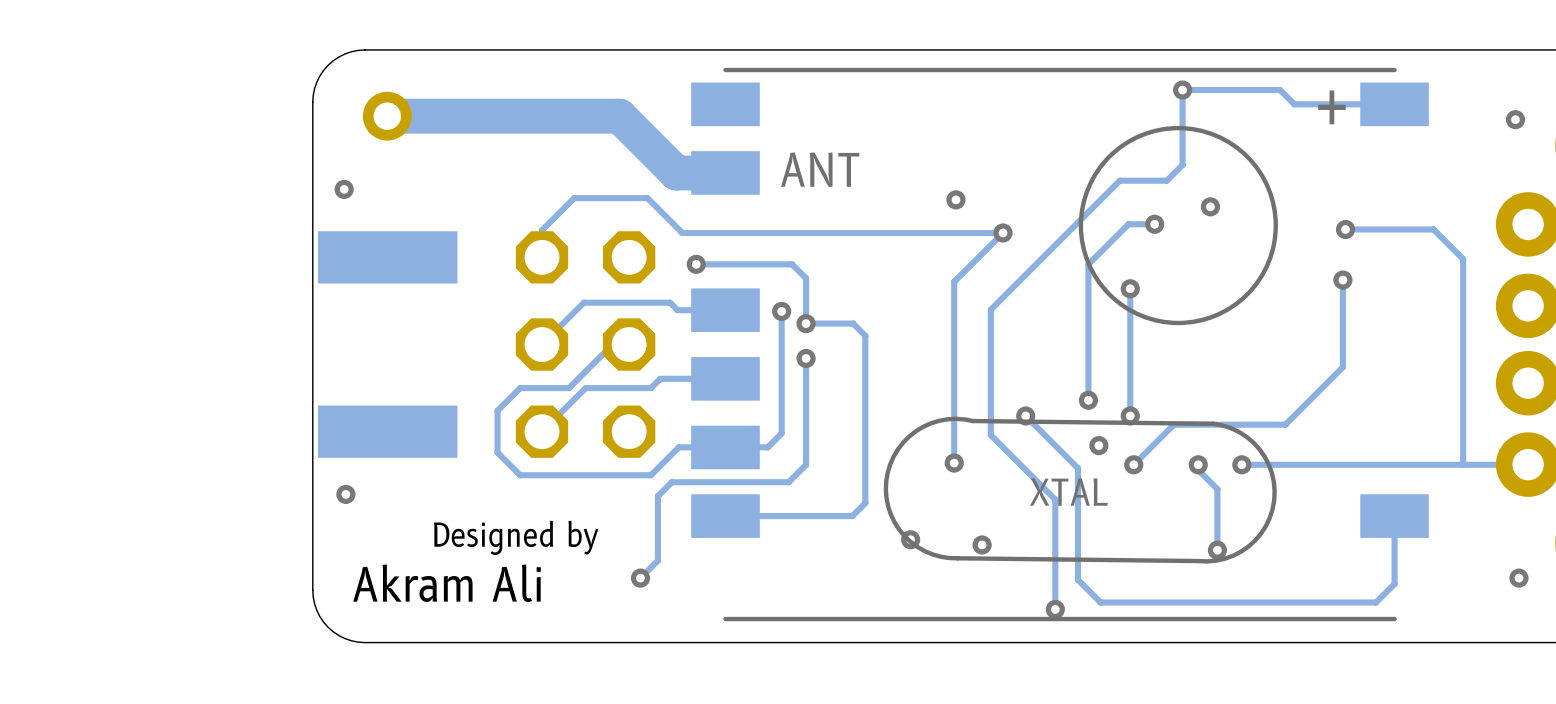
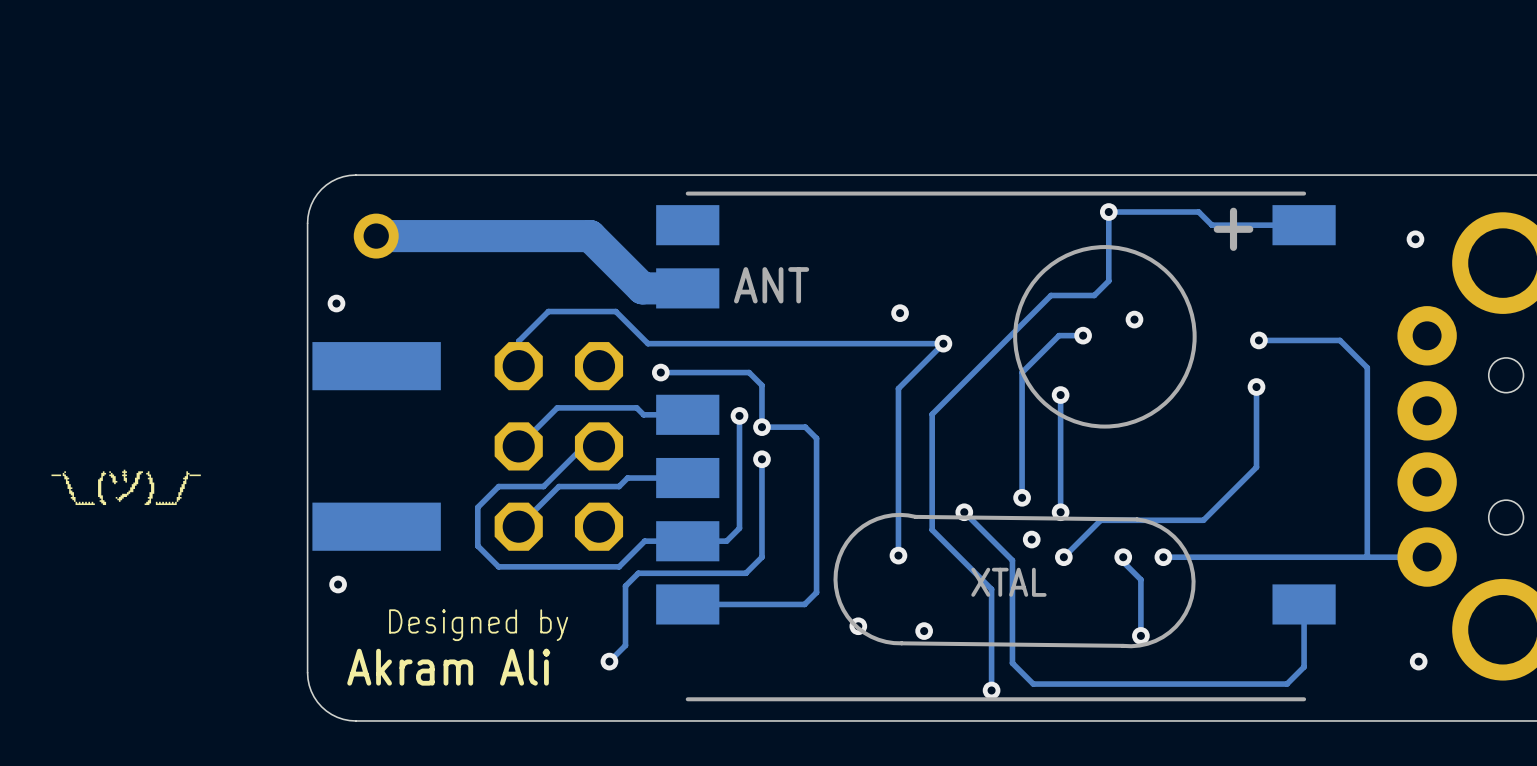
drawing: none -> [51, 469, 201, 506]

